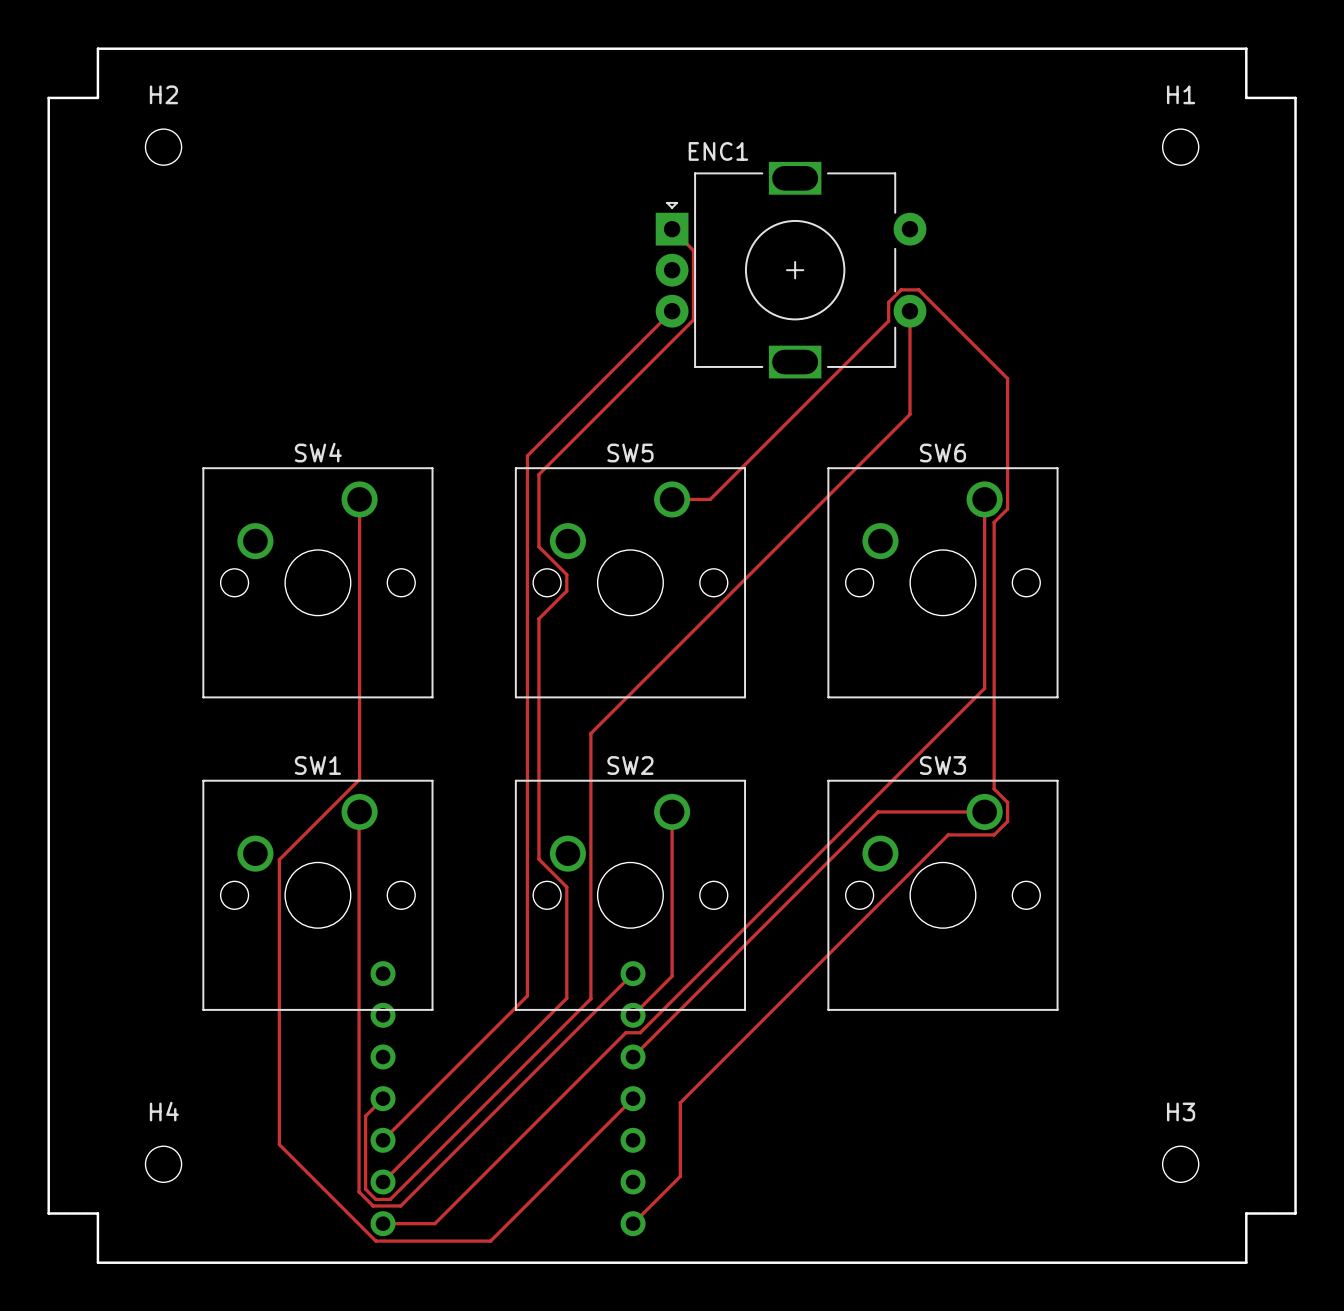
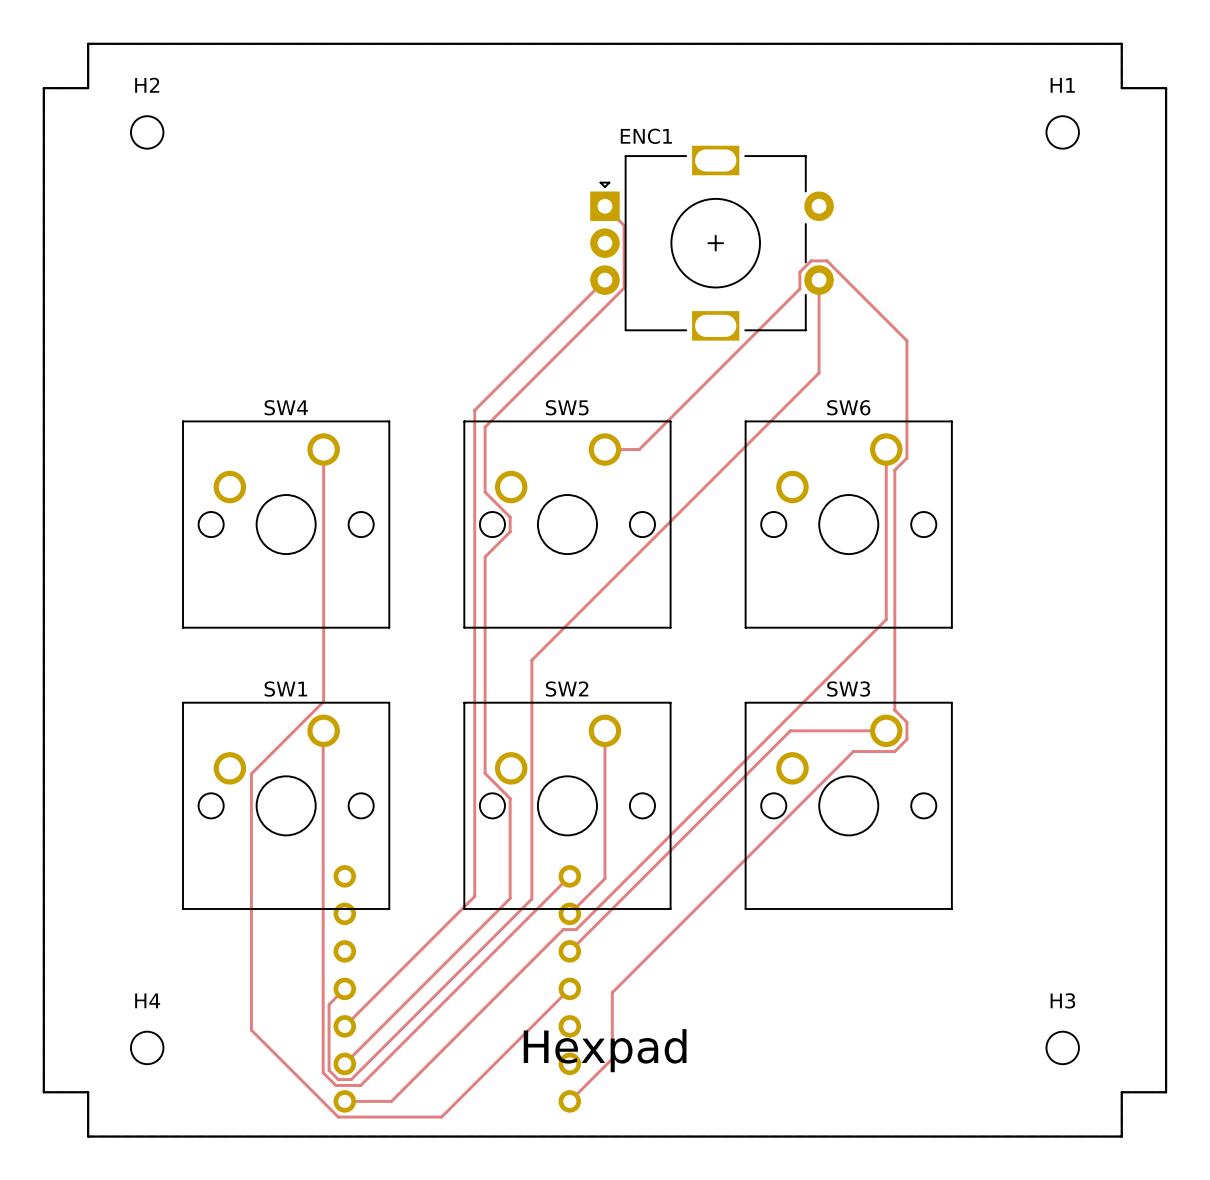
text: none -> Hexpad (605, 1050)

